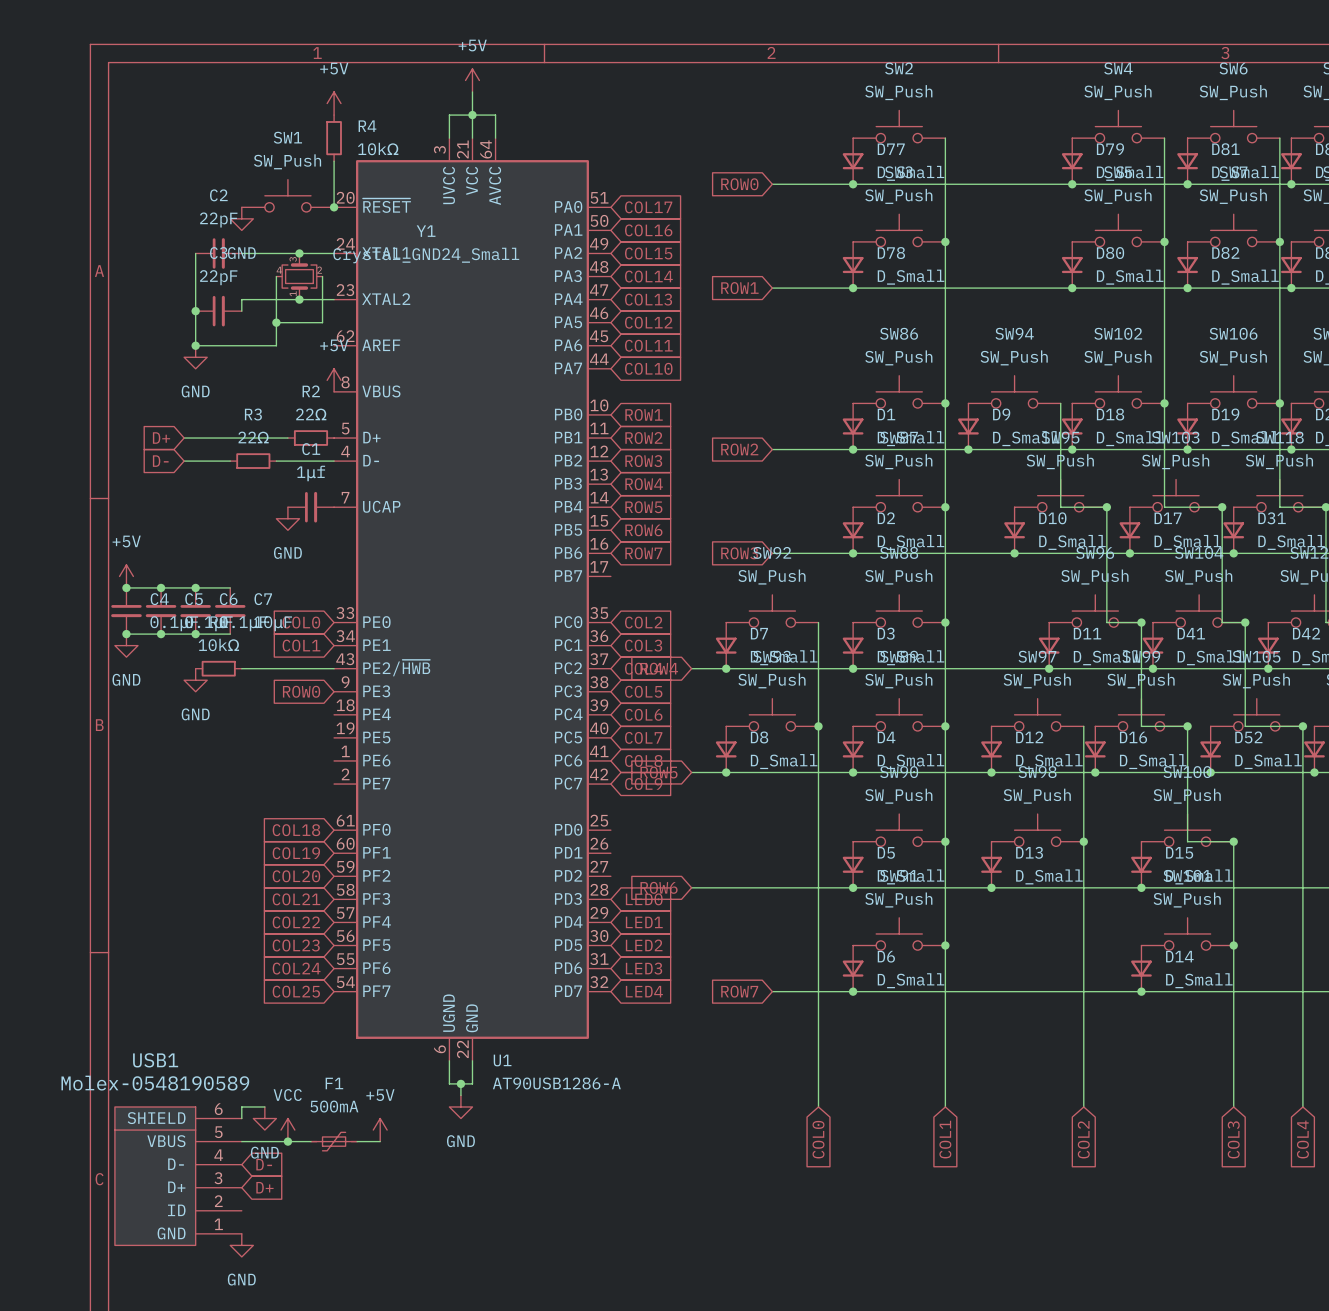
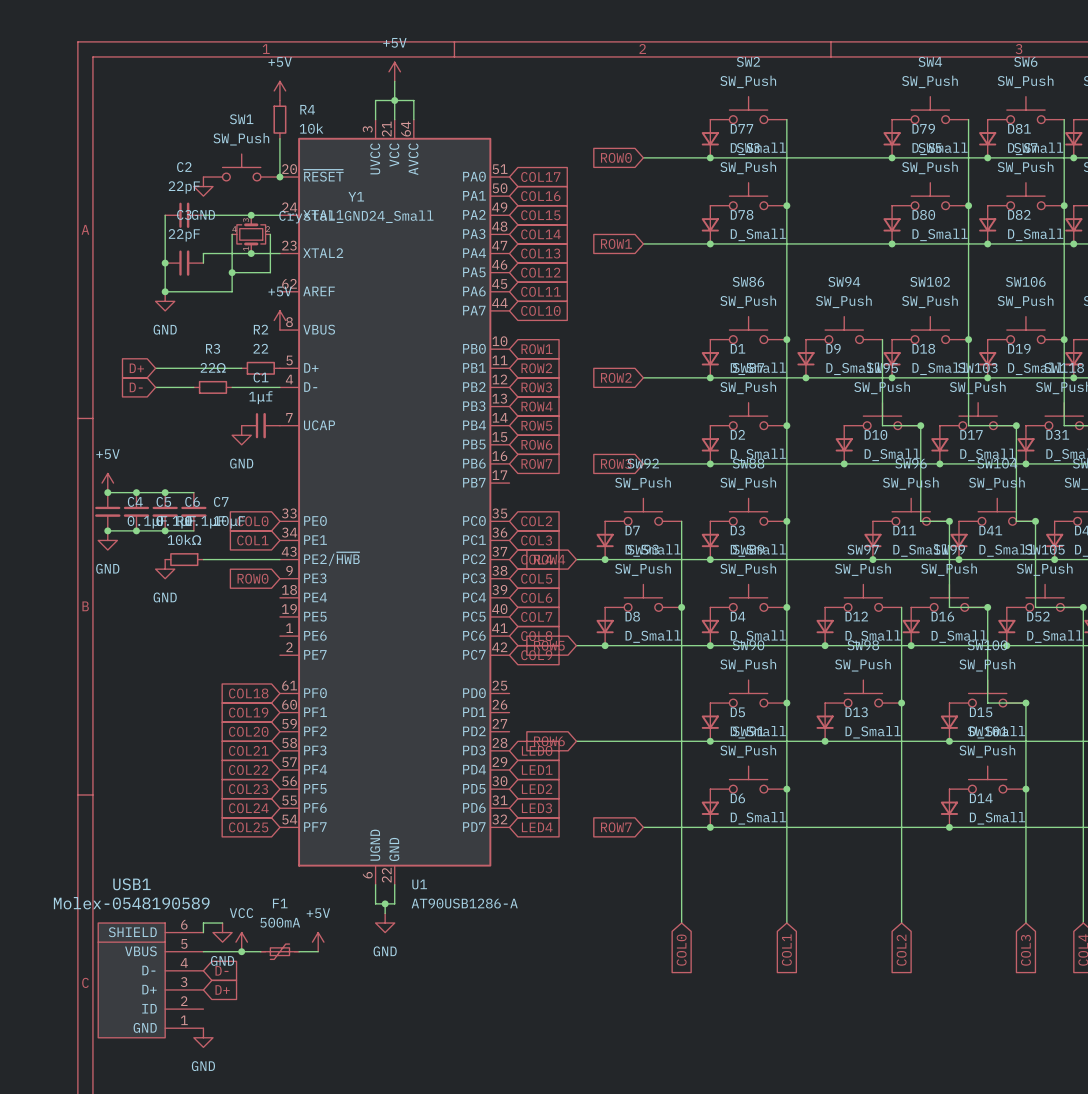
R4 value: 10kΩ (378, 148) -> 10k (311, 128)
R2 value: 22Ω (311, 414) -> 22 (260, 348)

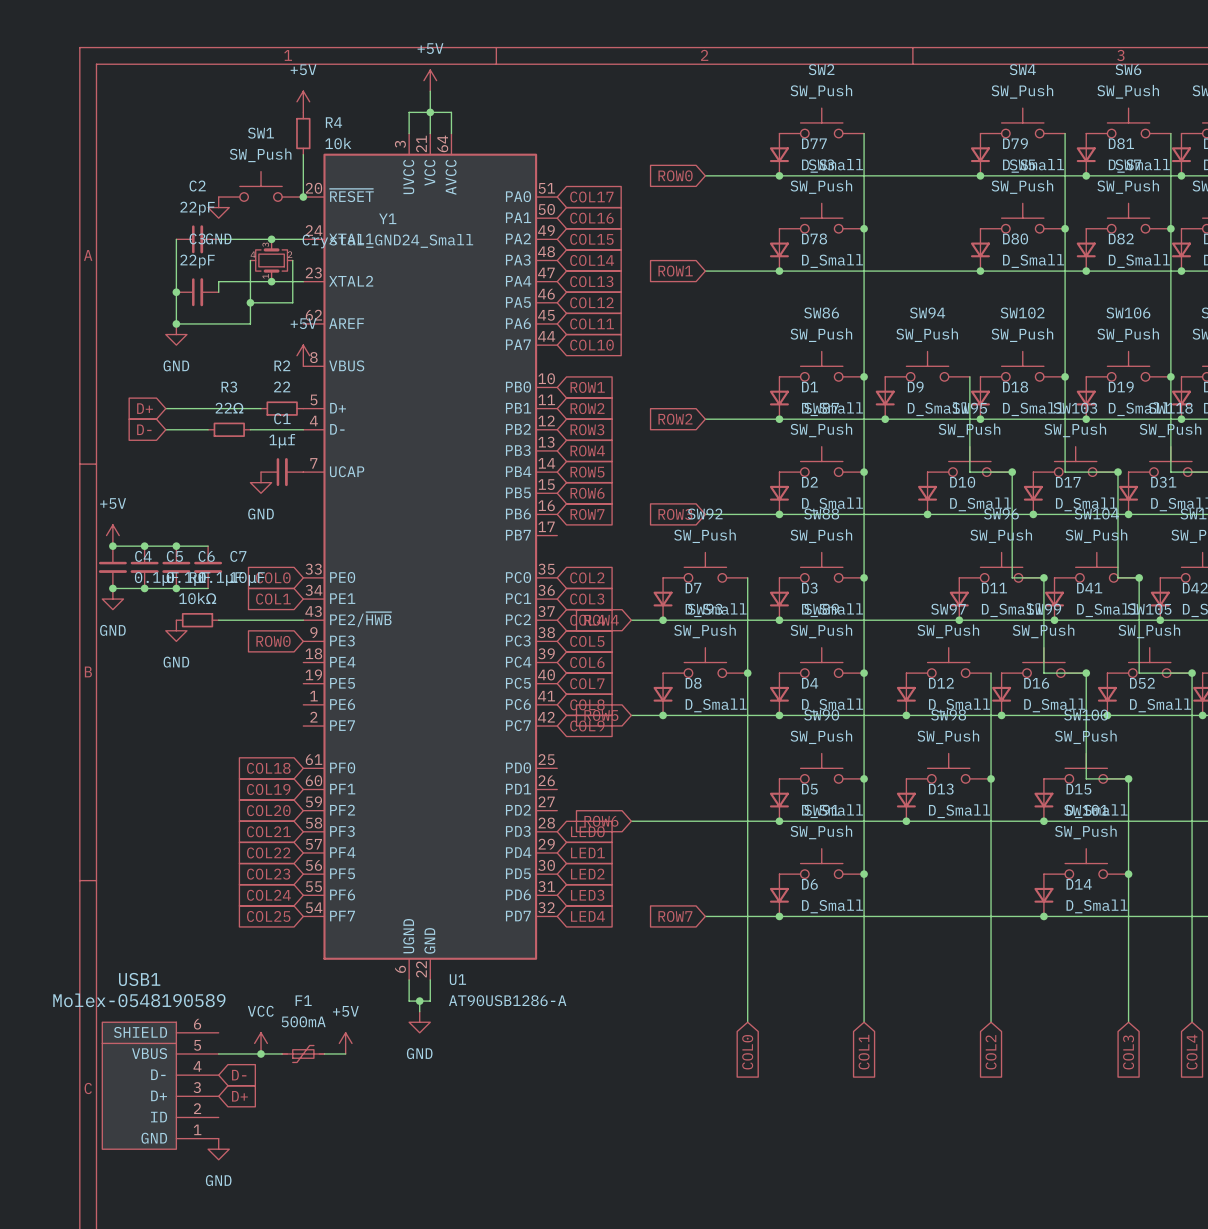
wire: (222, 923) (203, 923) (203, 932) -> none
power symbol: GND (222, 932) -> none

